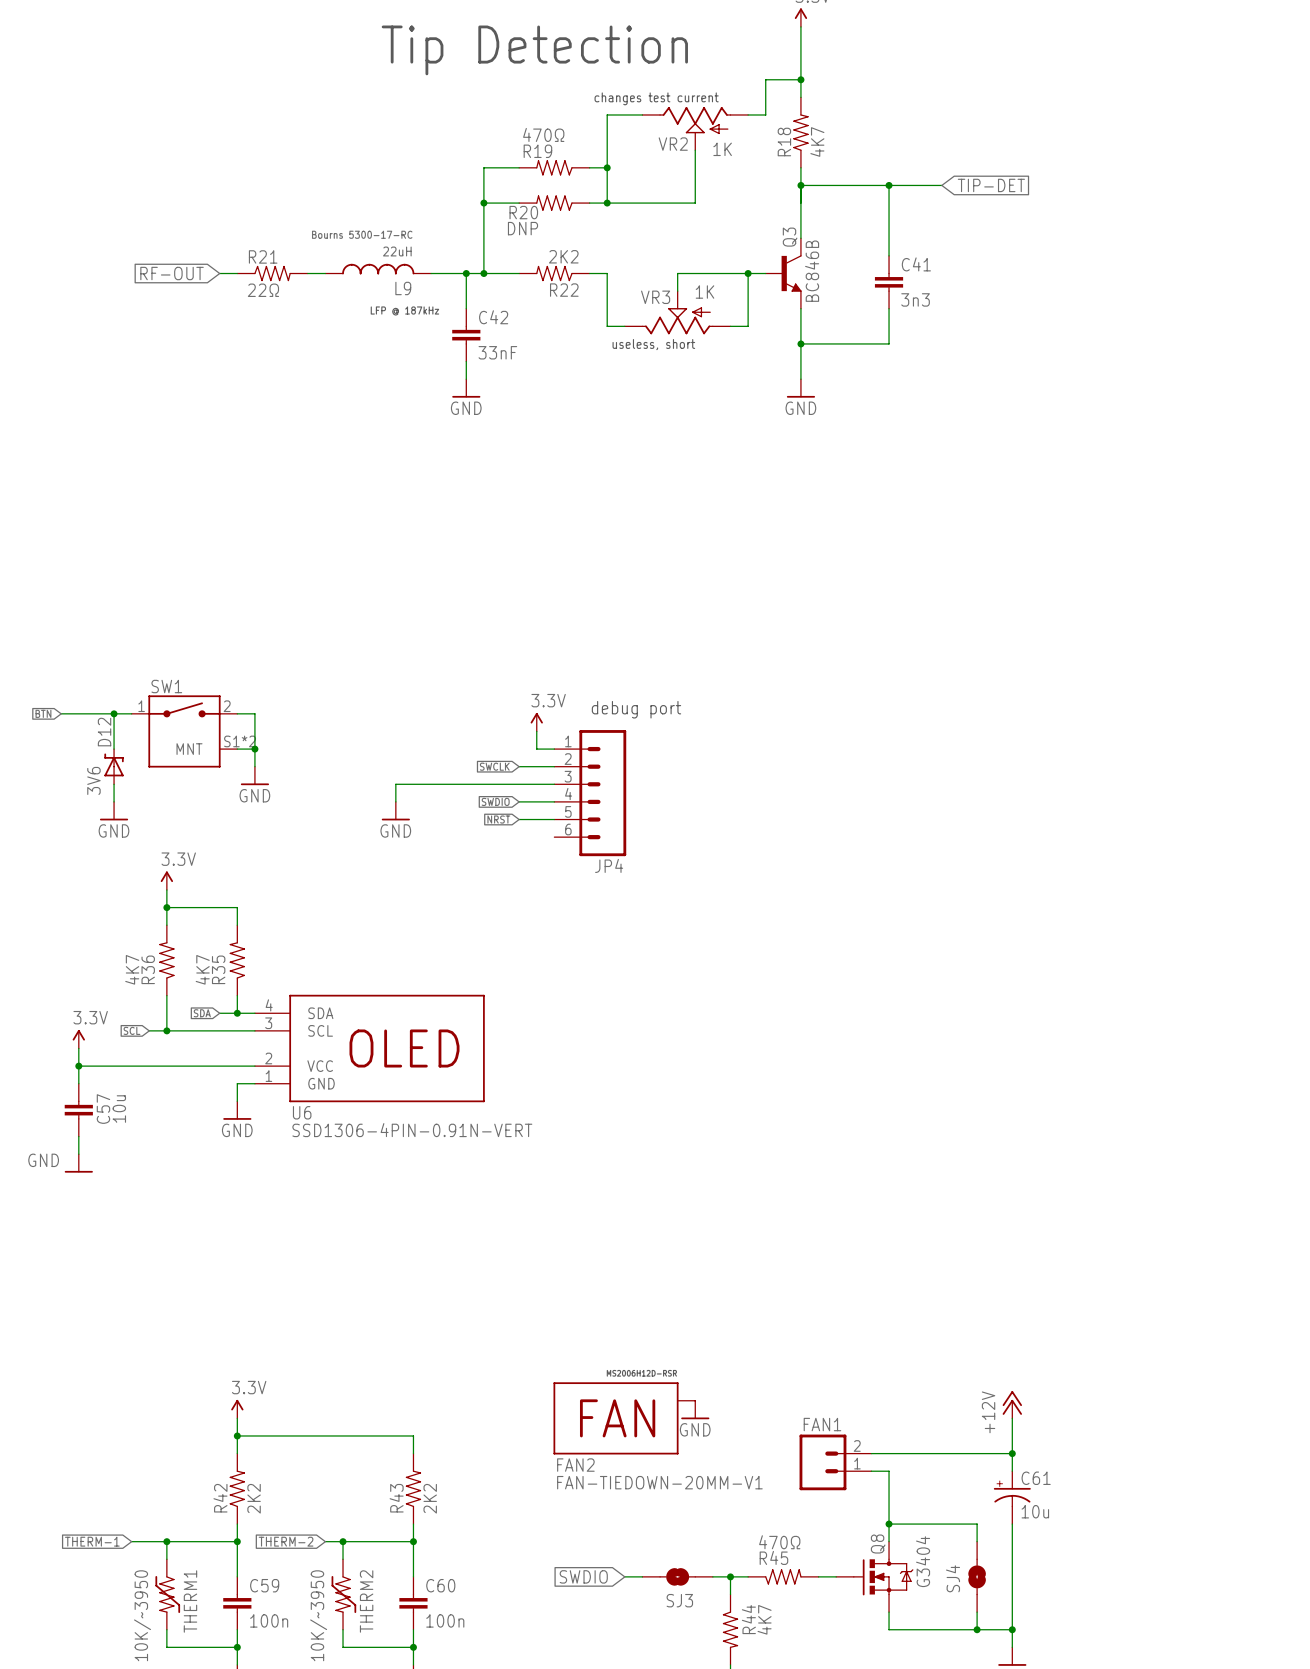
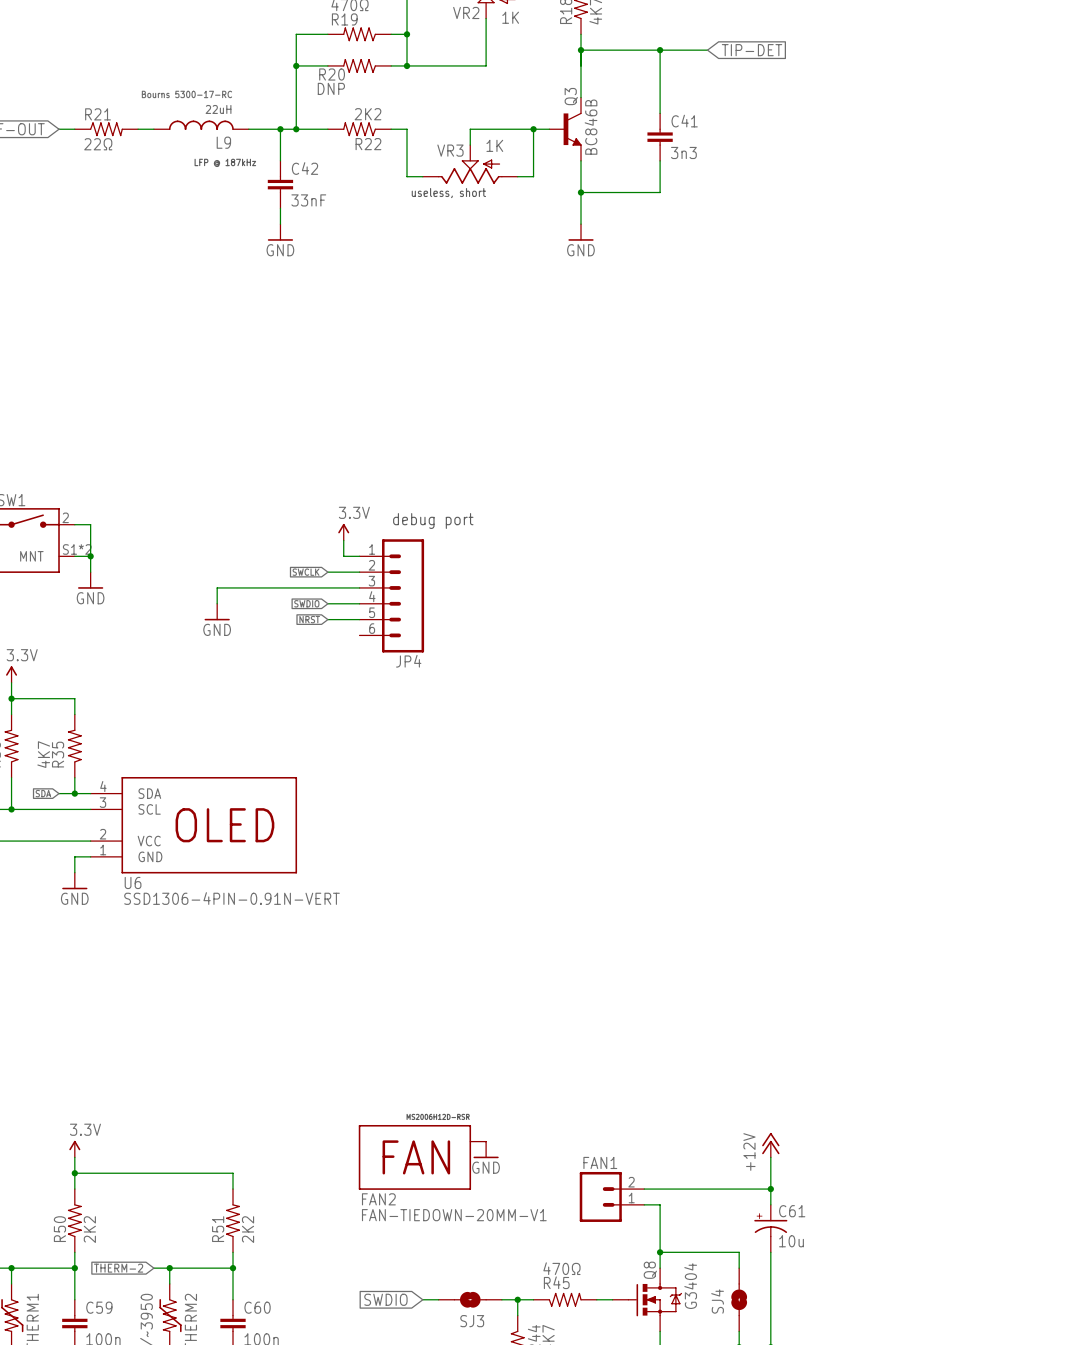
R42 name: R42 (220, 1498) -> R50 (59, 1229)
R43 name: R43 (396, 1498) -> R51 (218, 1229)

